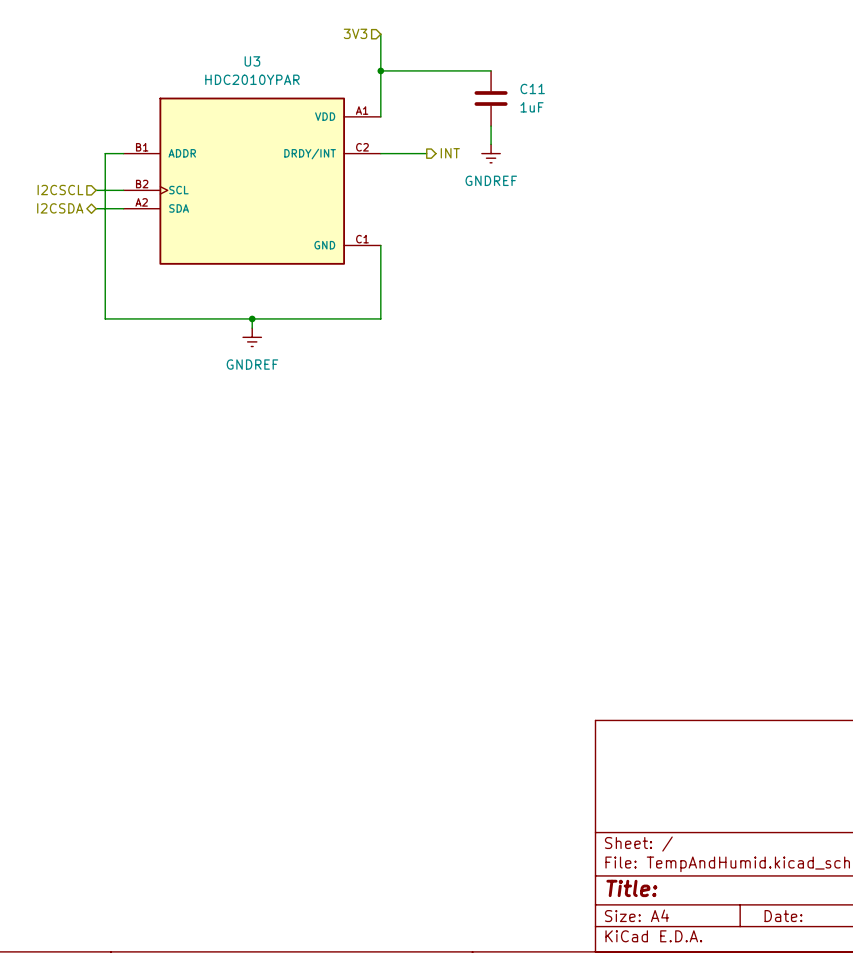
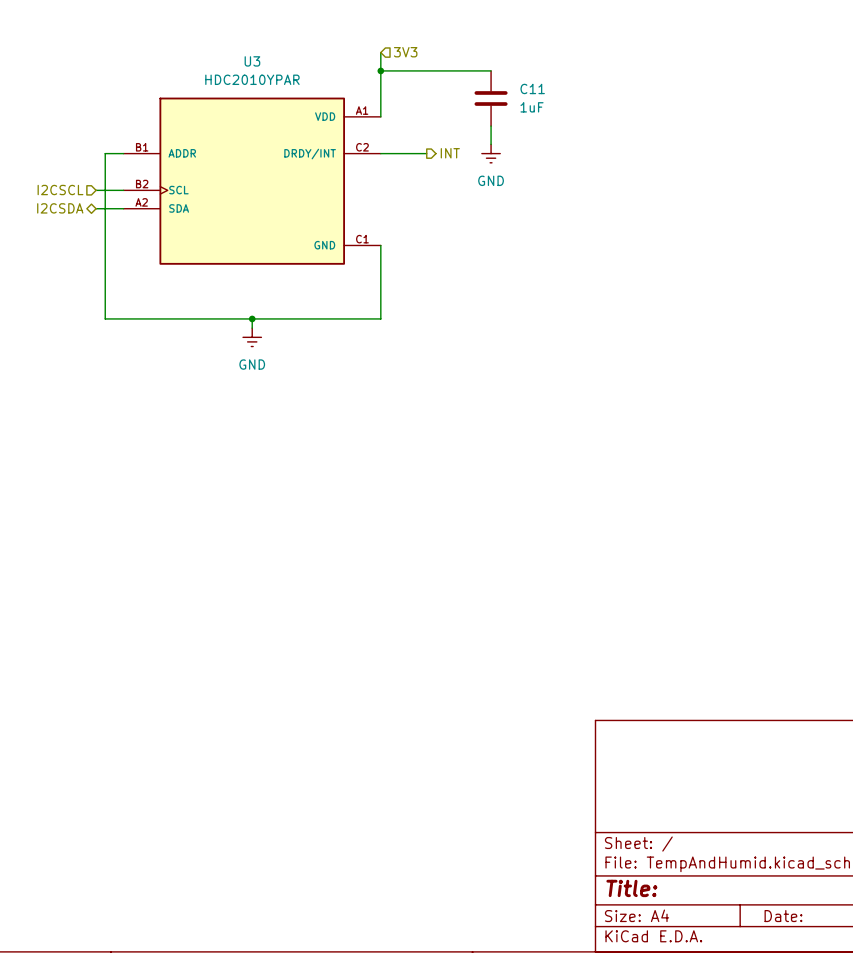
hierarchical label rotation: 0° (355, 33) -> 180° (405, 52)
hierarchical label position: 3V3 (355, 33) -> 3V3 (405, 52)
wire: (380, 34) (380, 52) -> none
power symbol: GNDREF (491, 153) -> GND (491, 153)
power symbol: GNDREF (252, 337) -> GND (252, 337)

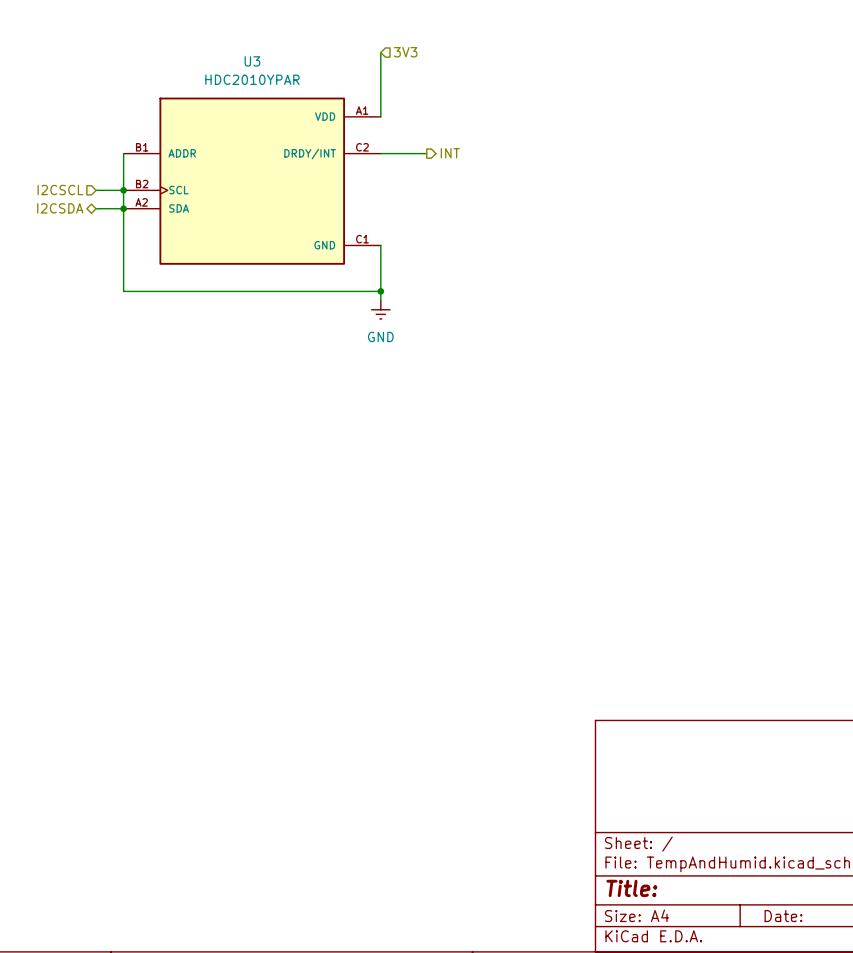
wire: (380, 70) (491, 70) -> none
junction: (380, 70) -> none
C11: 1uF (491, 98) -> none
wire: (491, 126) (491, 144) -> none
wire: (123, 153) (105, 153) (105, 318) (380, 318) (380, 300) -> (123, 153) (123, 291) (380, 291)
power symbol: GND (491, 153) -> none
junction: none -> (123, 190)
junction: none -> (123, 208)
junction: none -> (380, 291)
power symbol: none -> GND (380, 309)
wire: (252, 318) (252, 328) -> none
junction: (252, 318) -> none
power symbol: GND (252, 337) -> none

